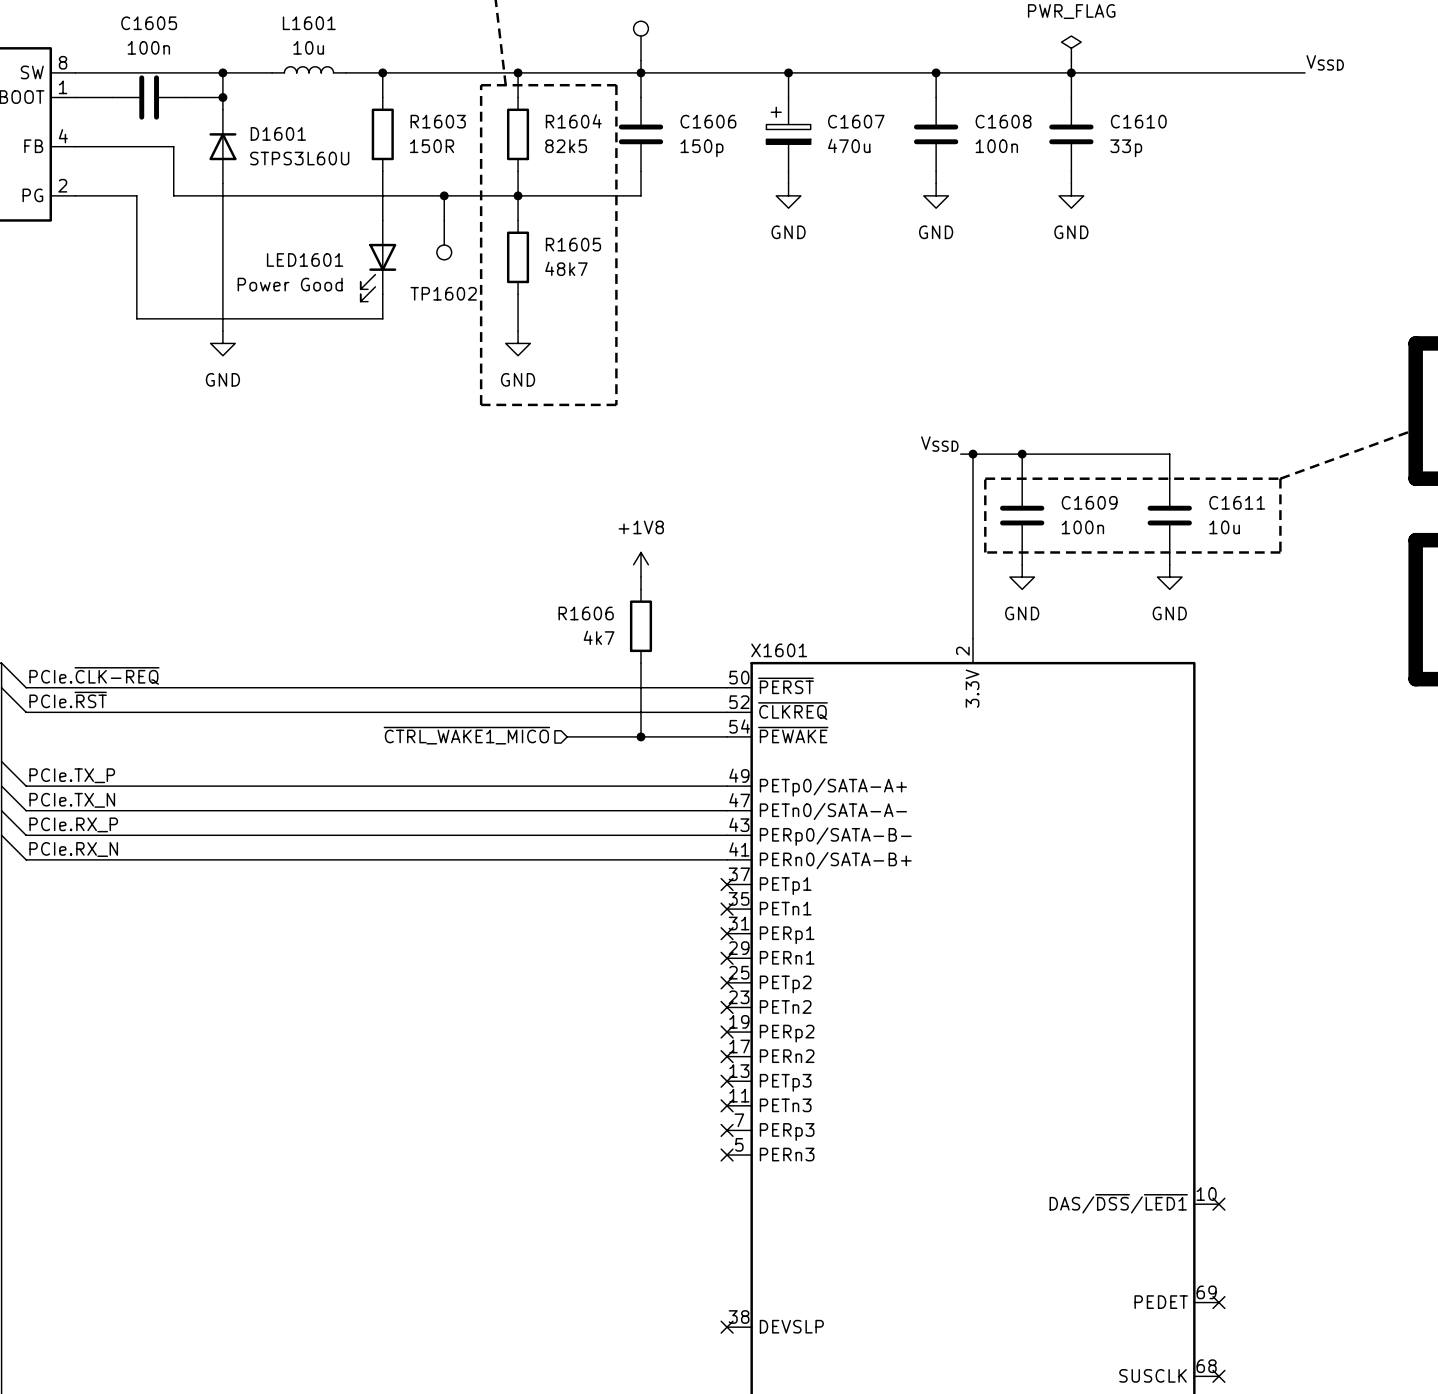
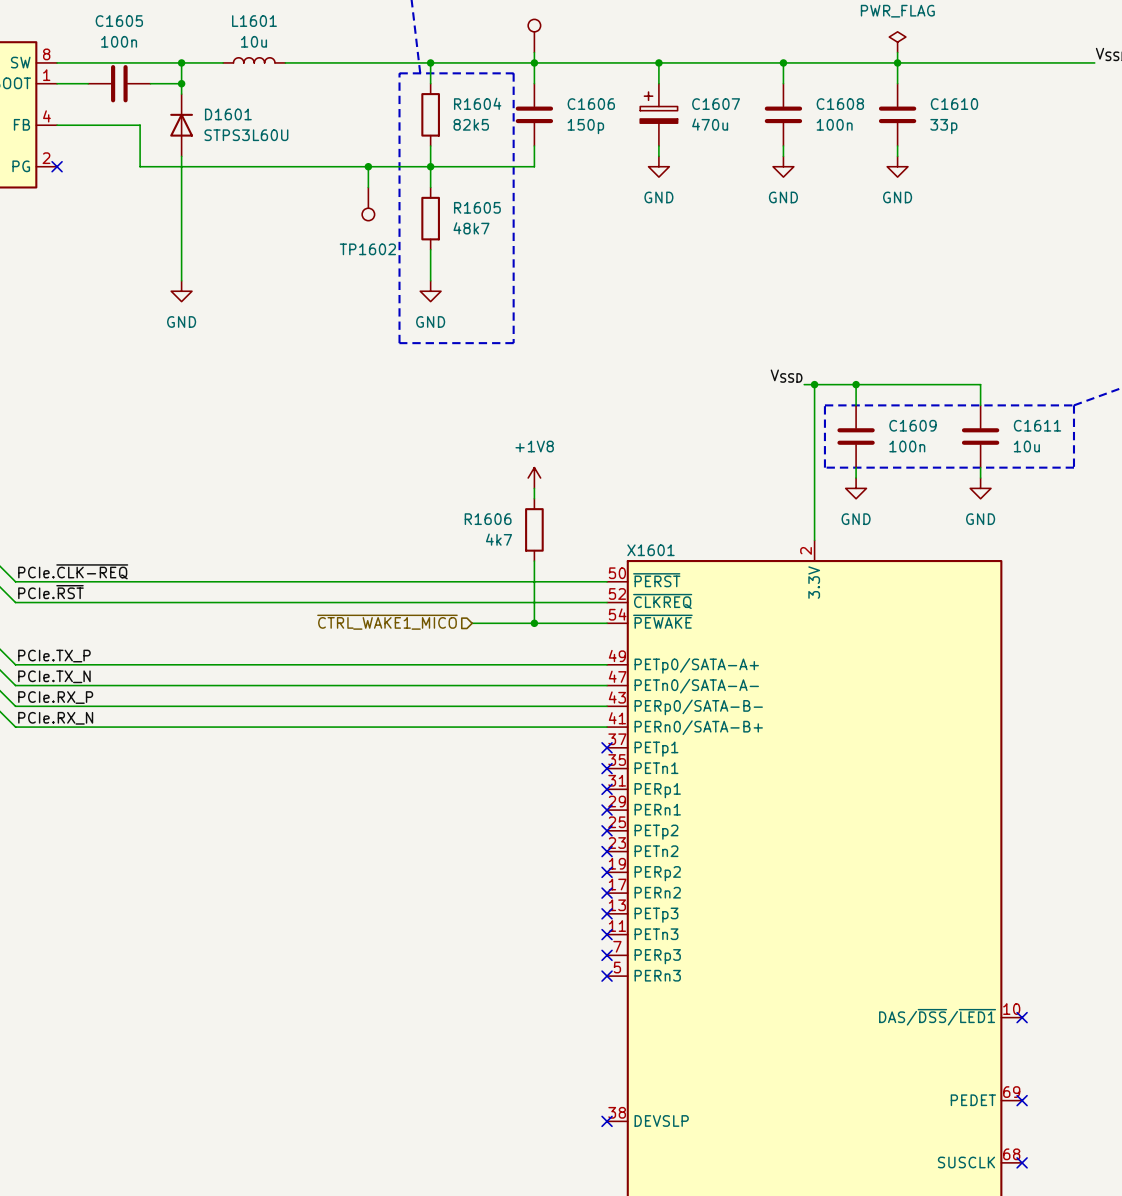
wire: (382, 72) (382, 97) -> none
junction: (382, 72) -> none
R1603: 150R (382, 134) -> none
wire: (382, 171) (382, 220) -> none
wire: (75, 195) (136, 195) (136, 318) (382, 318) (382, 294) -> none
no-connect mark: none -> (57, 166)
LED1601: Power Good (378, 261) -> none

